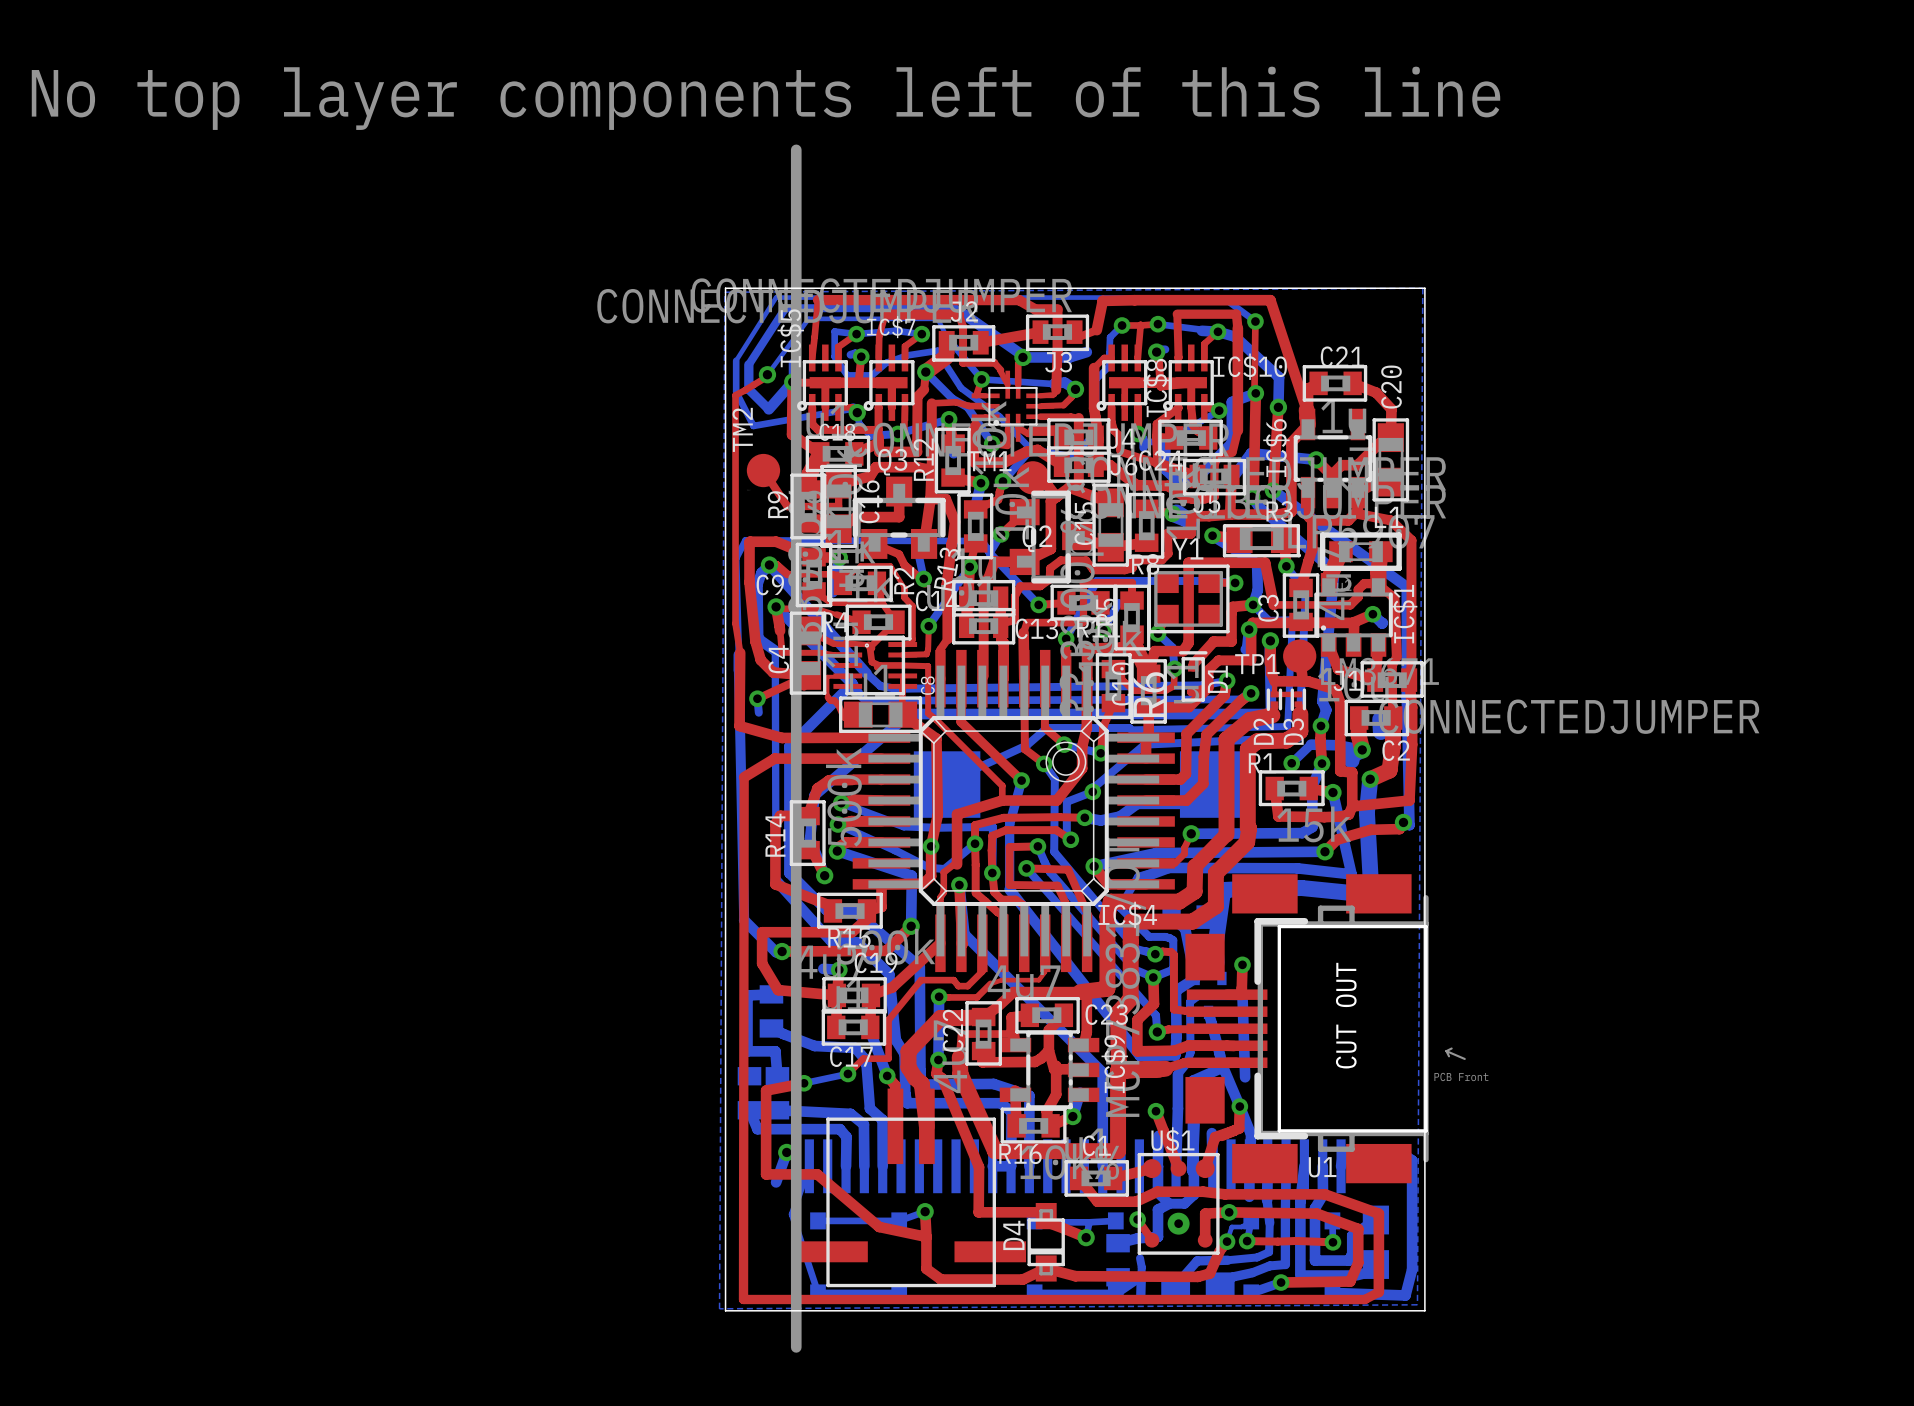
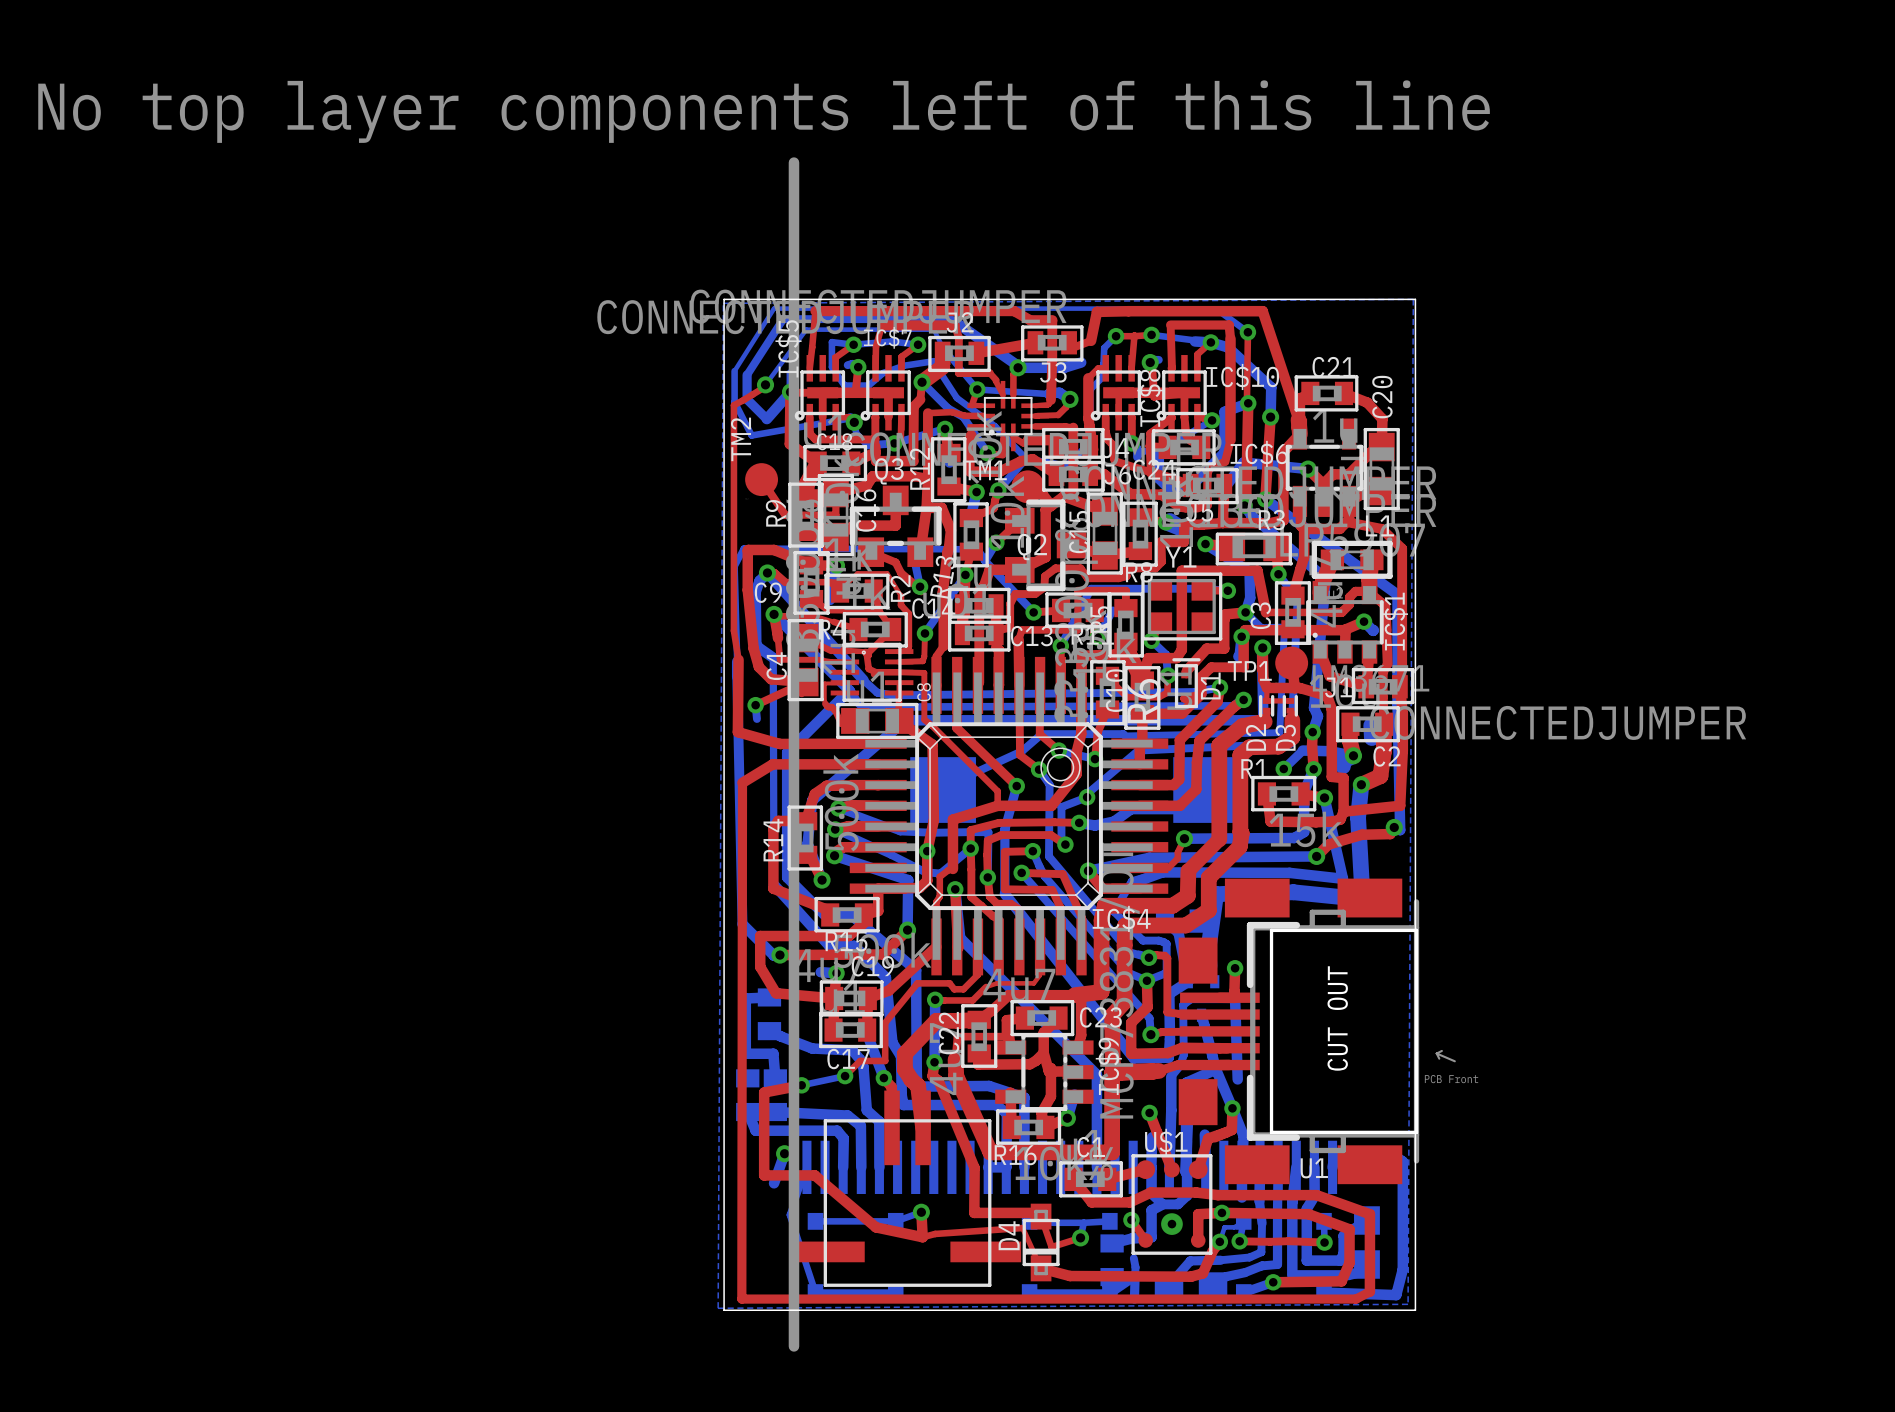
IC$6 name rotation: 0° (1276, 448) -> 90° clockwise (1259, 453)
top track: (1048, 1222) (1086, 1237) -> (1043, 1223) (1051, 1247) (1080, 1237)
top track: (926, 1236) (926, 1268) (941, 1279) (1022, 1279) (1046, 1268) -> (922, 1237) (935, 1233) (1022, 1228) (1041, 1268)

